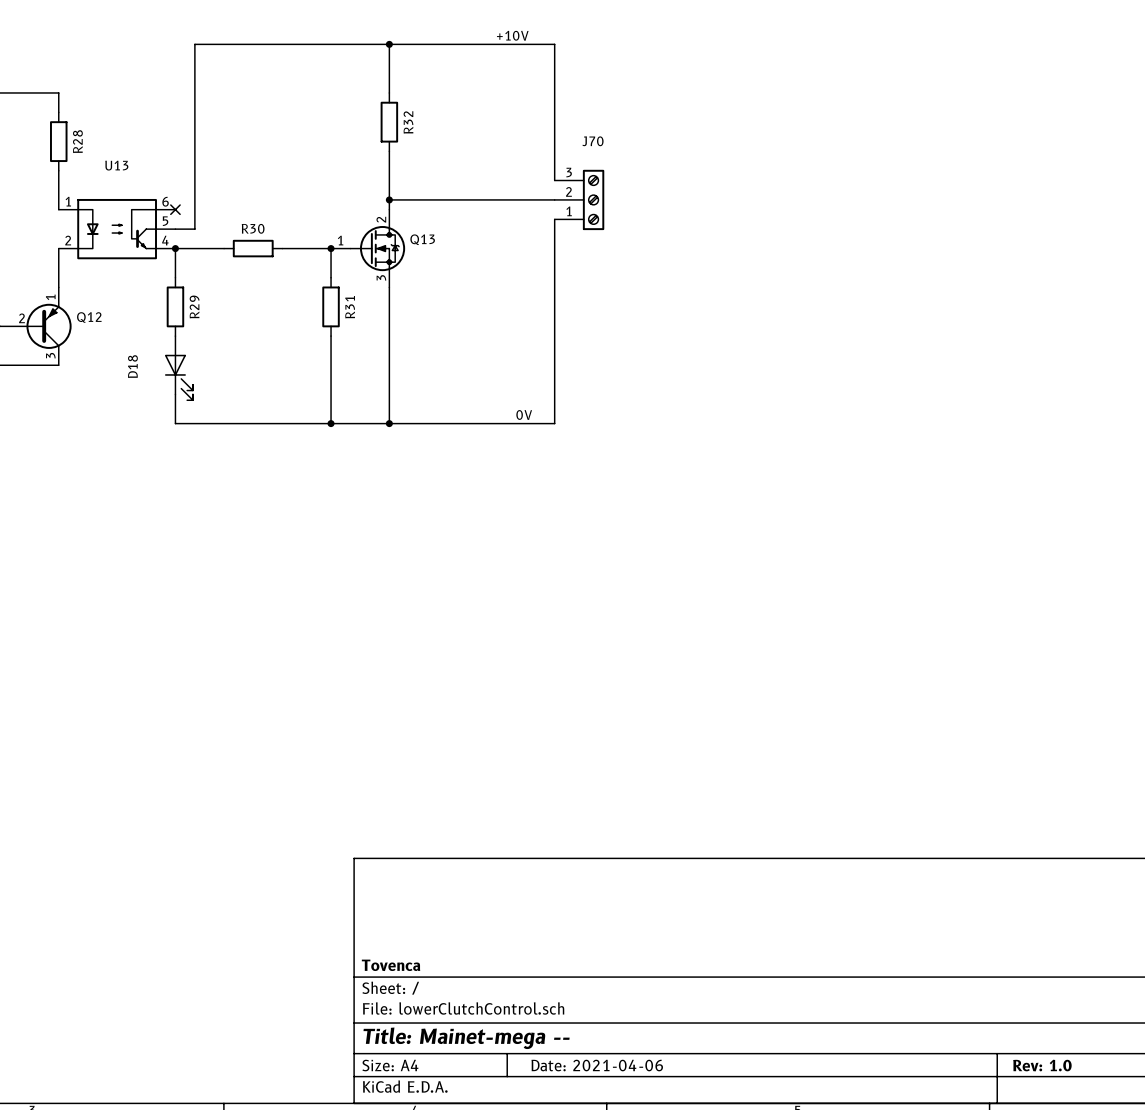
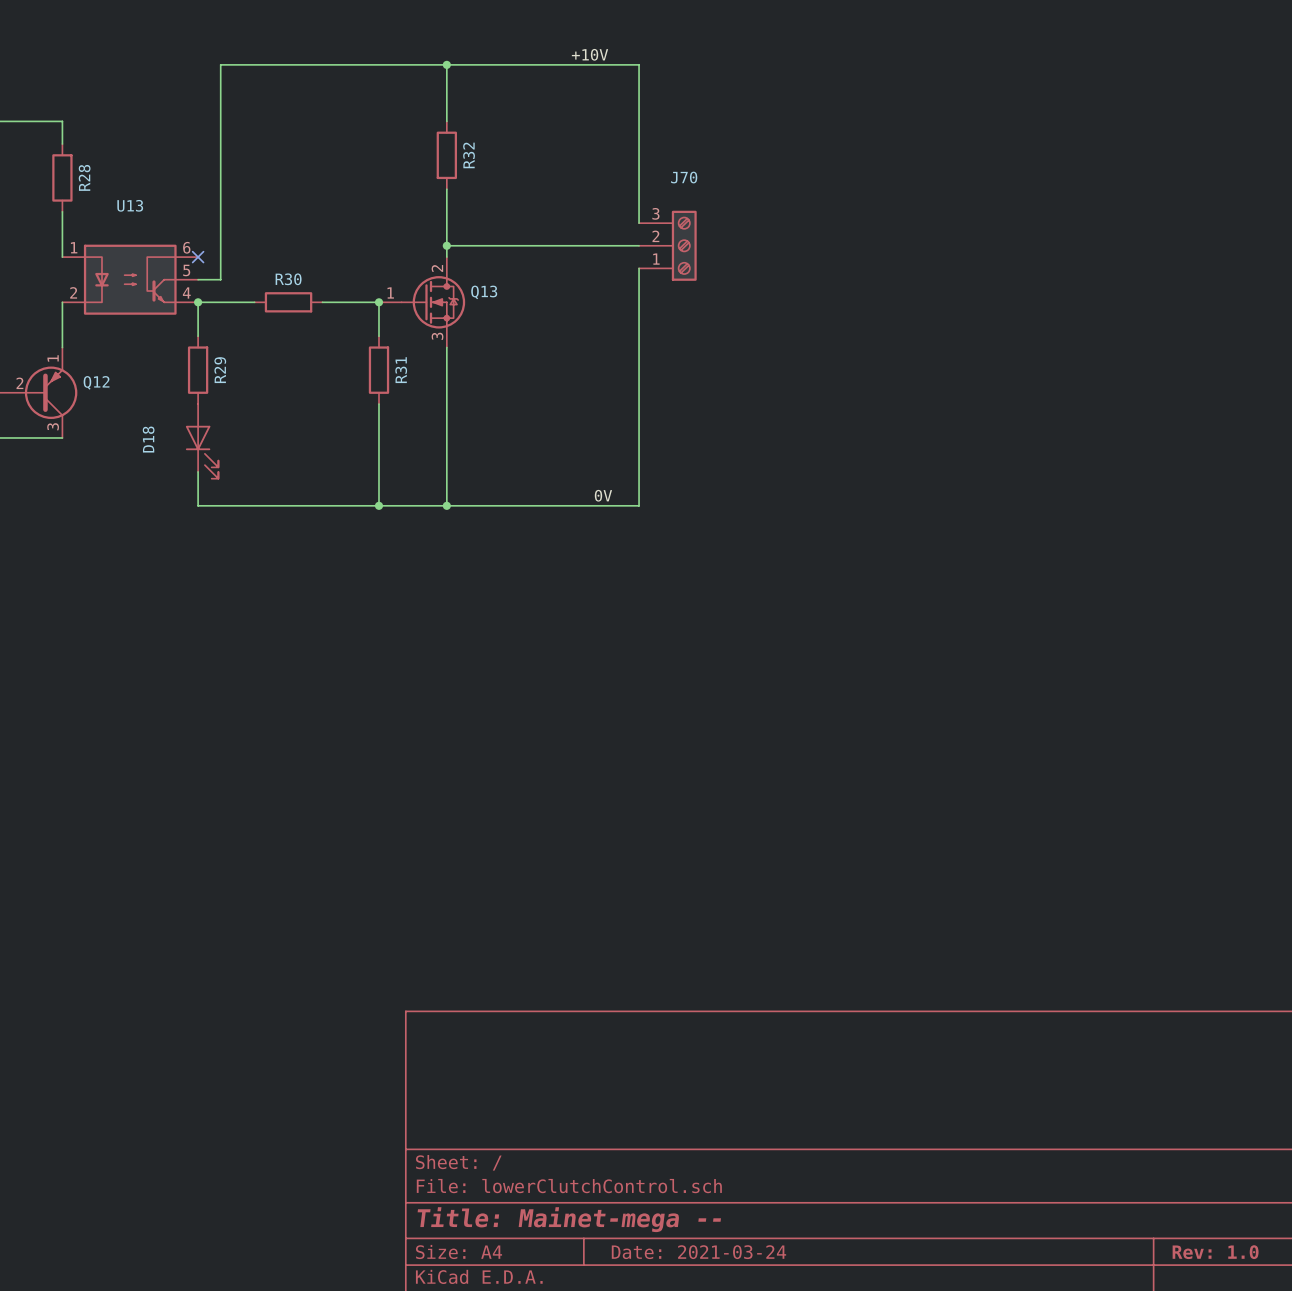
title block: Tovenca (391, 965) -> none
title block: Date: 2021-04-06 (597, 1065) -> Date: 2021-03-24 (698, 1252)

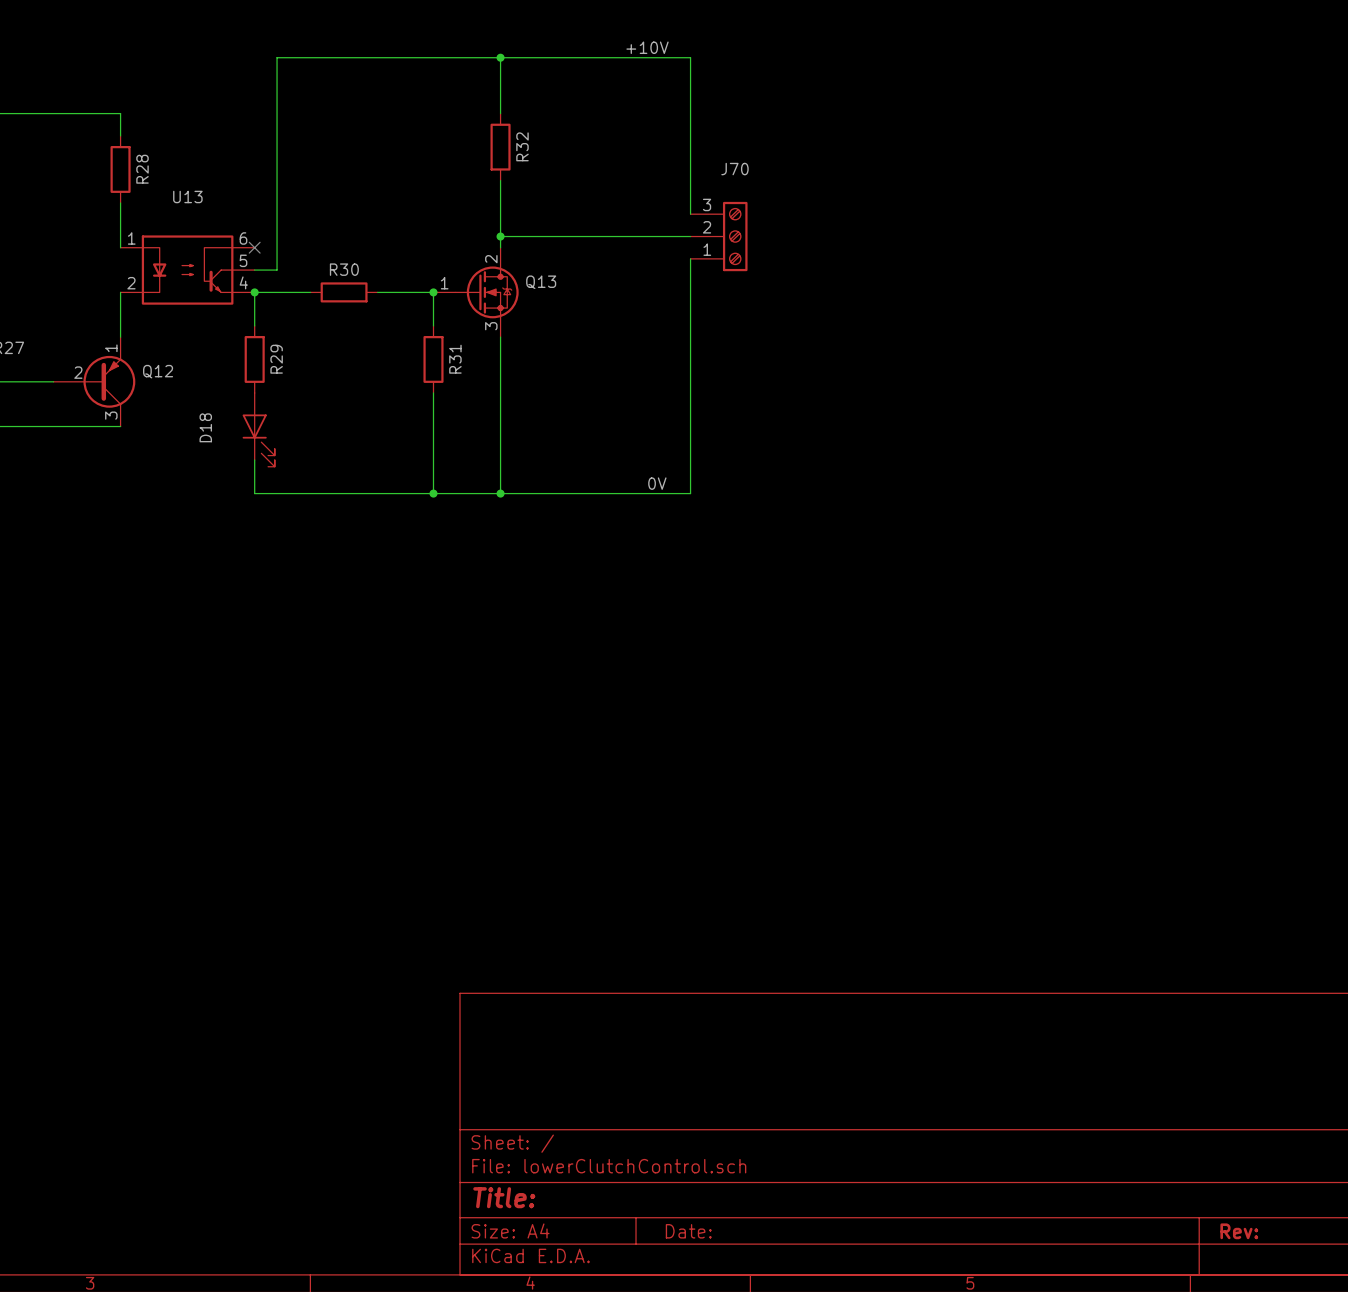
title block: Title: Mainet-mega -- (569, 1219) -> Title: (504, 1197)
title block: Date: 2021-03-24 (698, 1252) -> Date: (688, 1231)
title block: Rev: 1.0 (1215, 1252) -> Rev: (1239, 1231)

